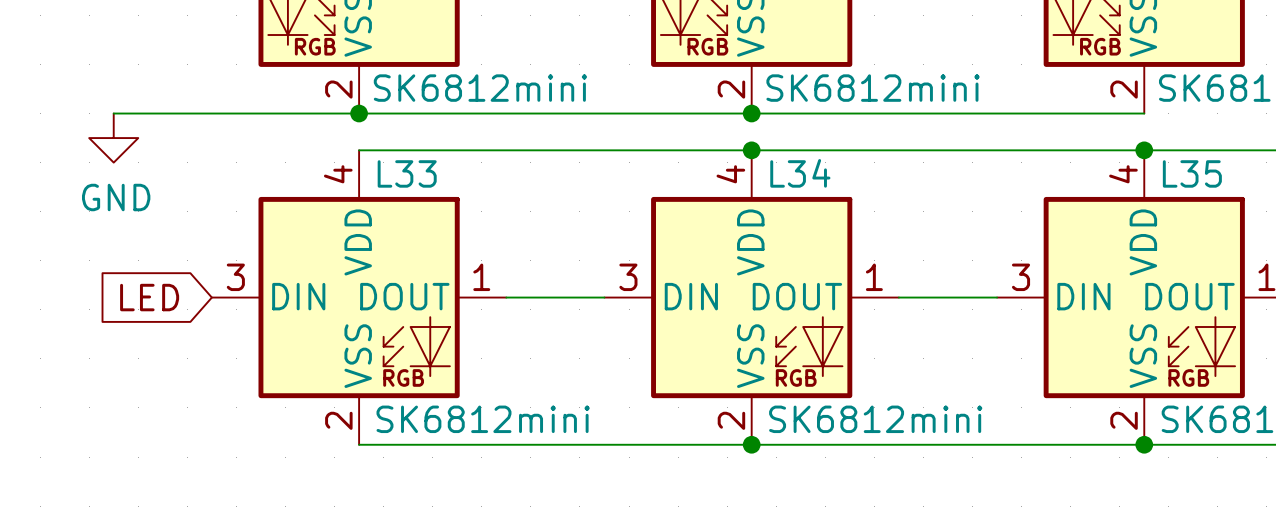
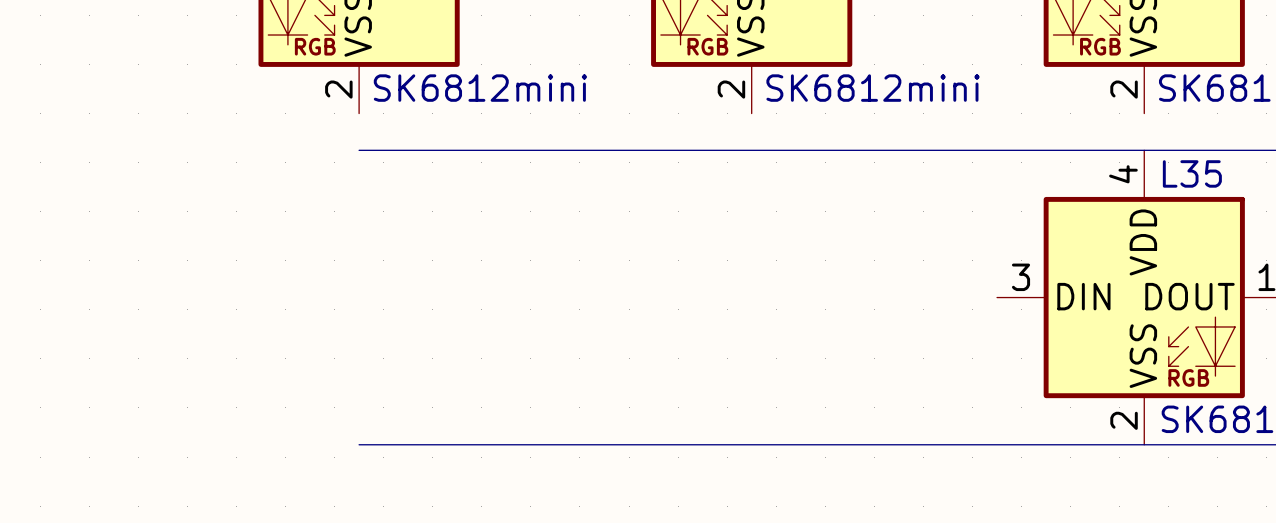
wire: (113, 113) (1144, 113) -> none
junction: (359, 113) -> none
junction: (751, 113) -> none
power symbol: GND (113, 138) -> none
junction: (751, 150) -> none
junction: (1144, 150) -> none
global label: LED (149, 297) -> none
L33: SK6812mini (359, 297) -> none
wire: (506, 297) (604, 297) -> none
L34: SK6812mini (751, 297) -> none
wire: (898, 297) (997, 297) -> none
junction: (751, 444) -> none
junction: (1144, 444) -> none

